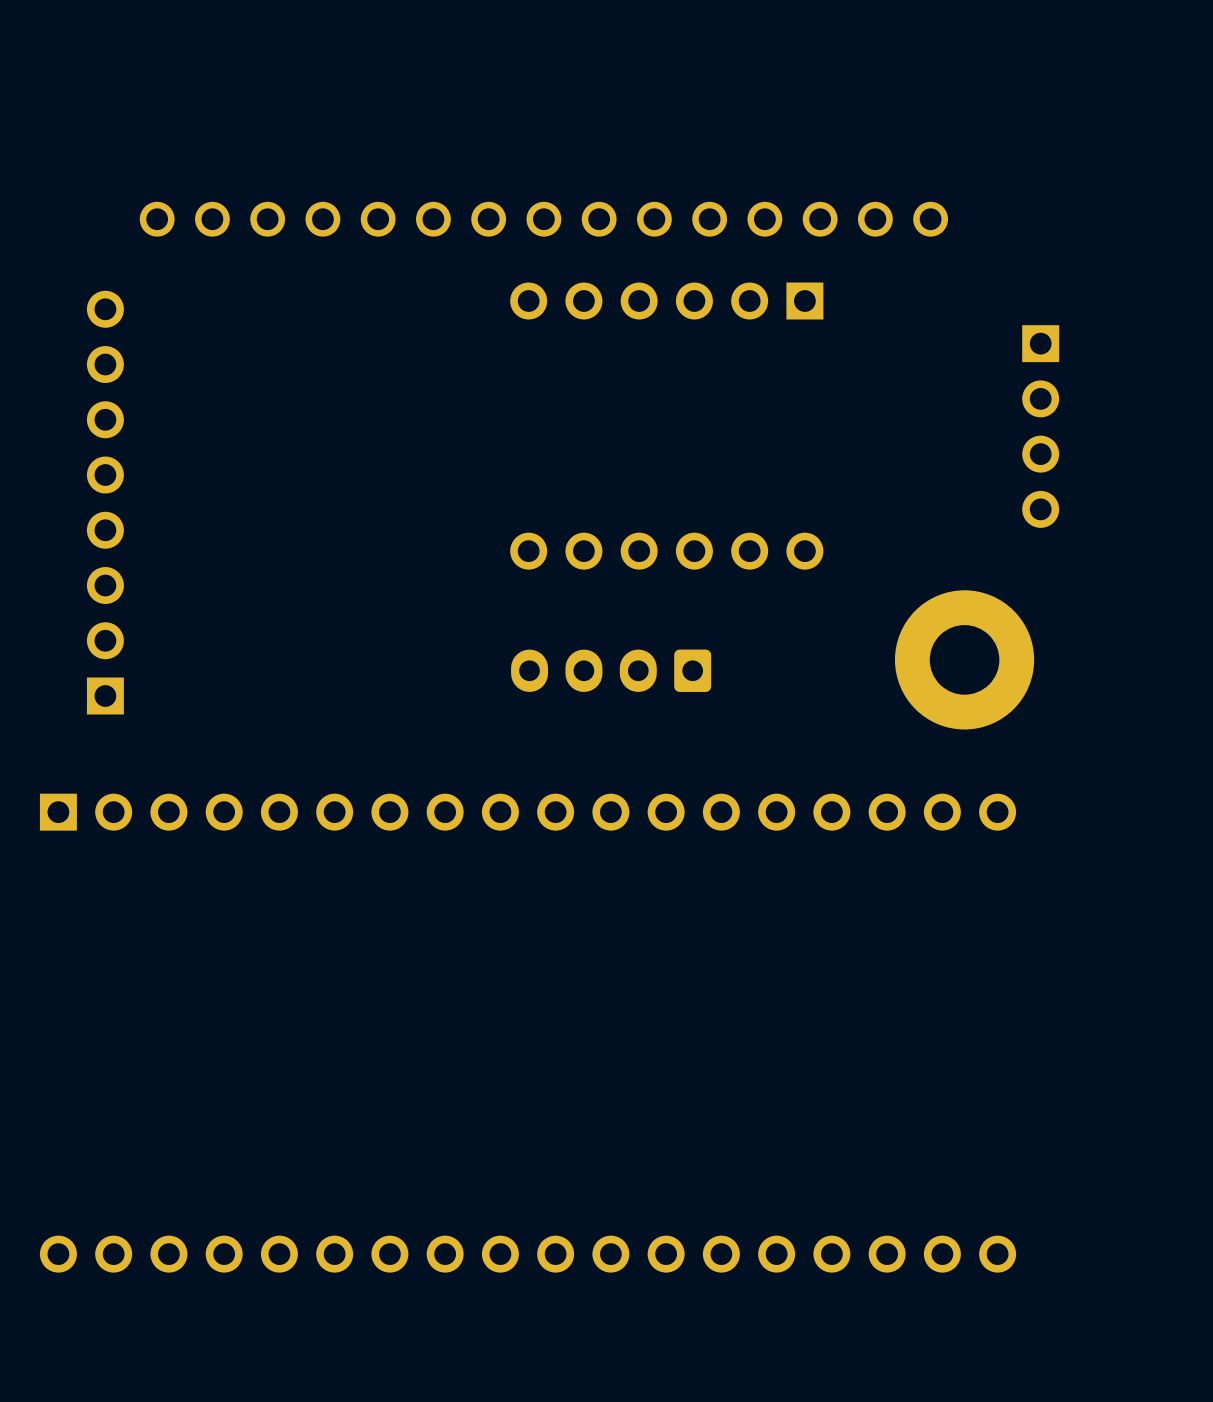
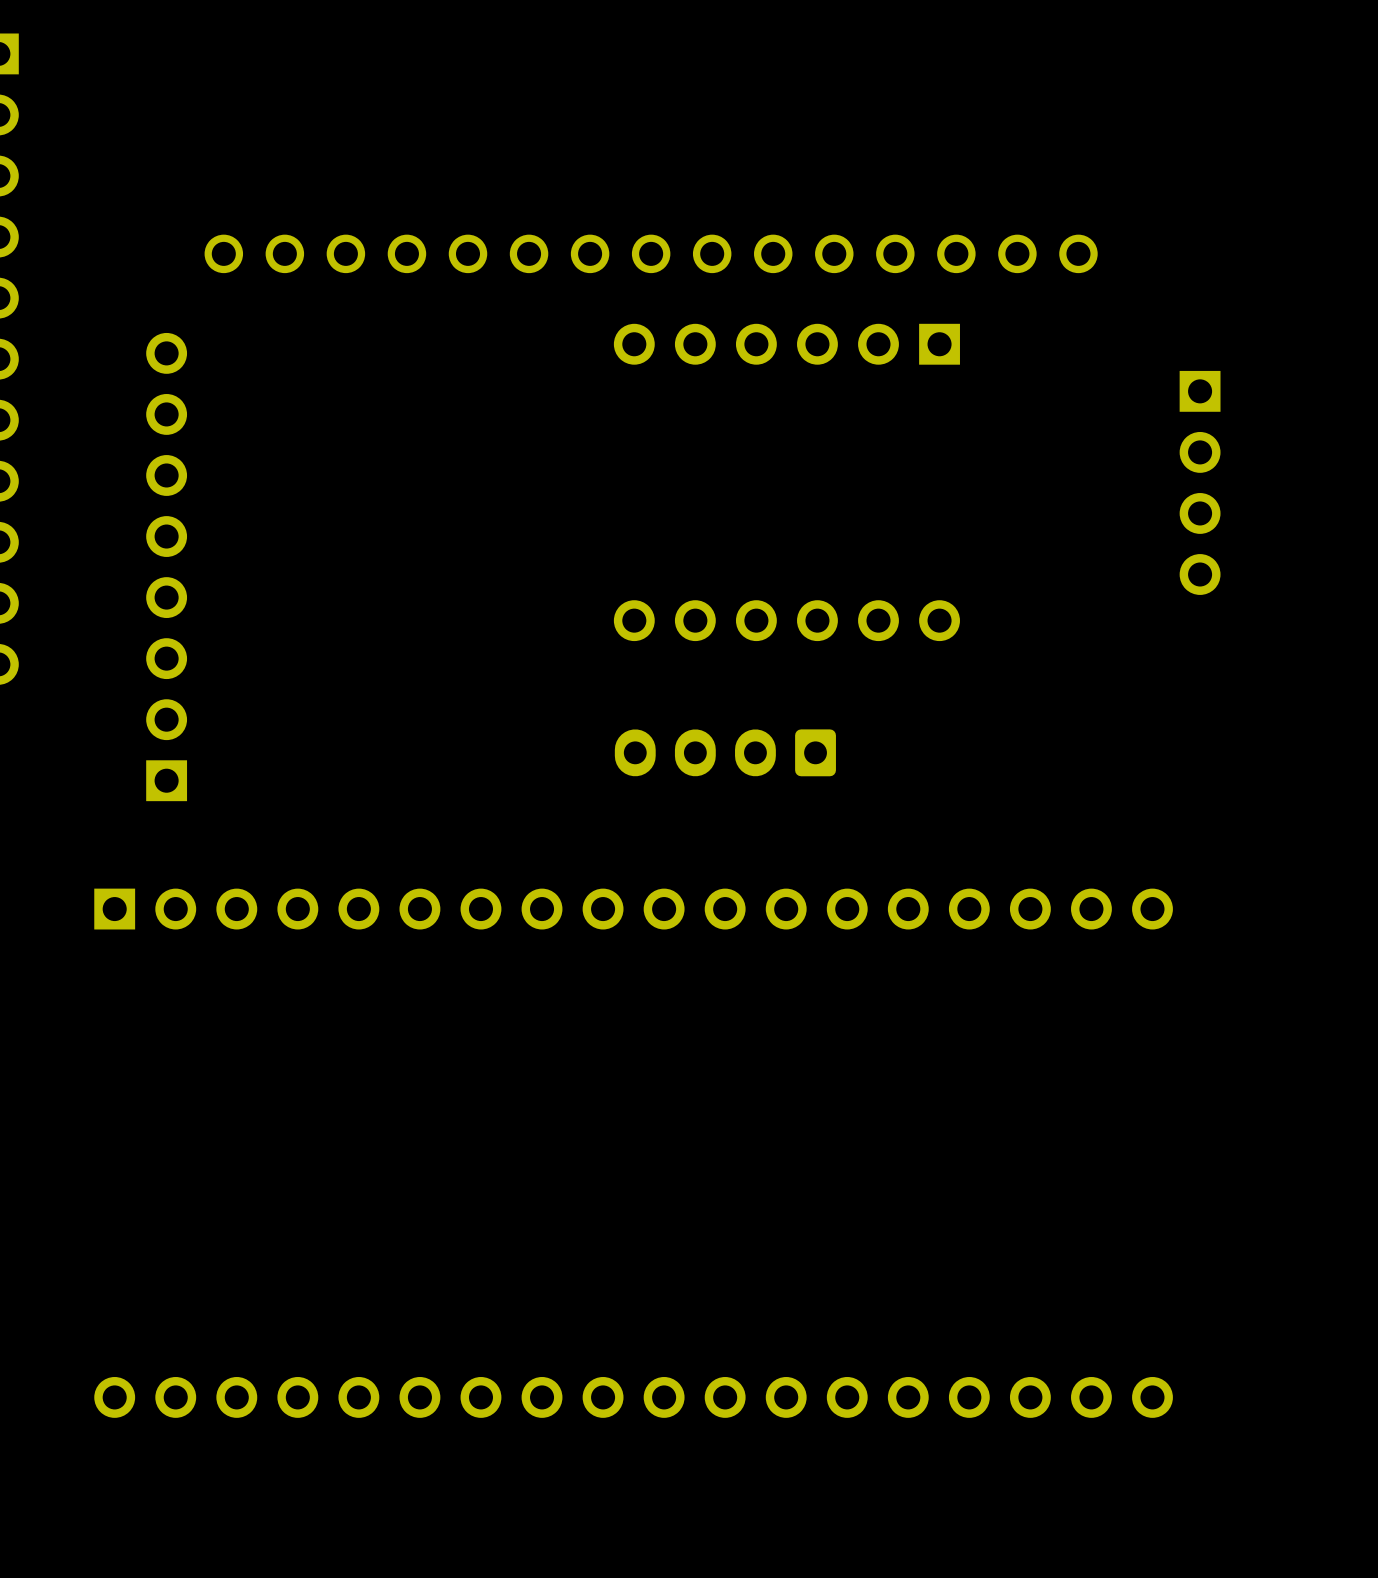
part: (964, 659) -> none

